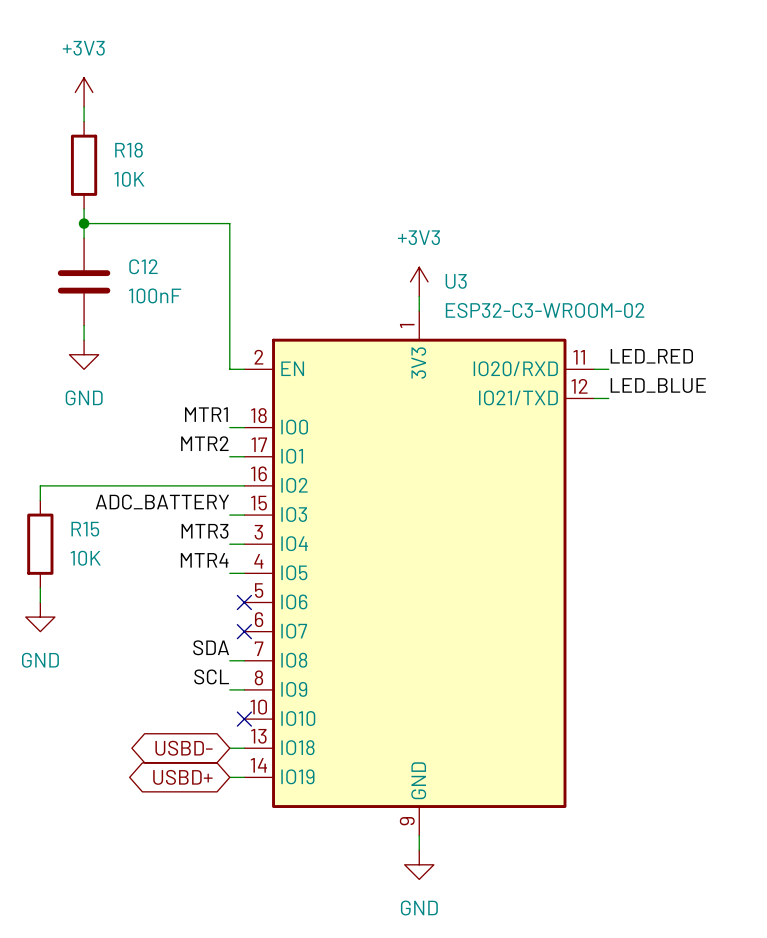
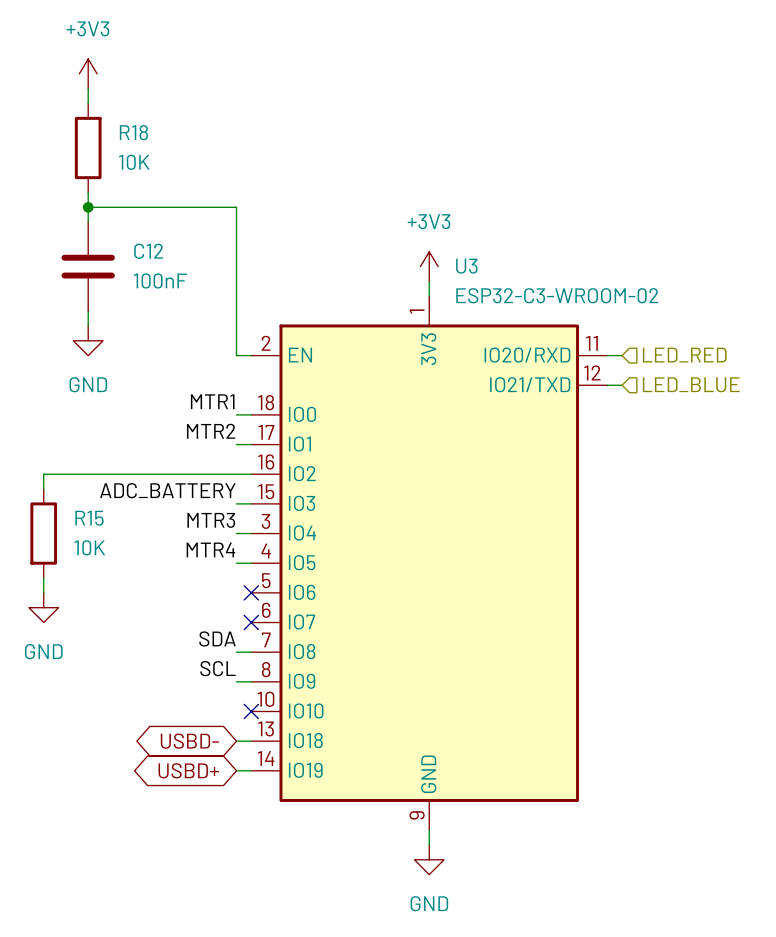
label: LED_RED (651, 356) -> none
hierarchical label: none -> LED_RED (684, 355)
label: LED_BLUE (658, 385) -> none
hierarchical label: none -> LED_BLUE (691, 384)

